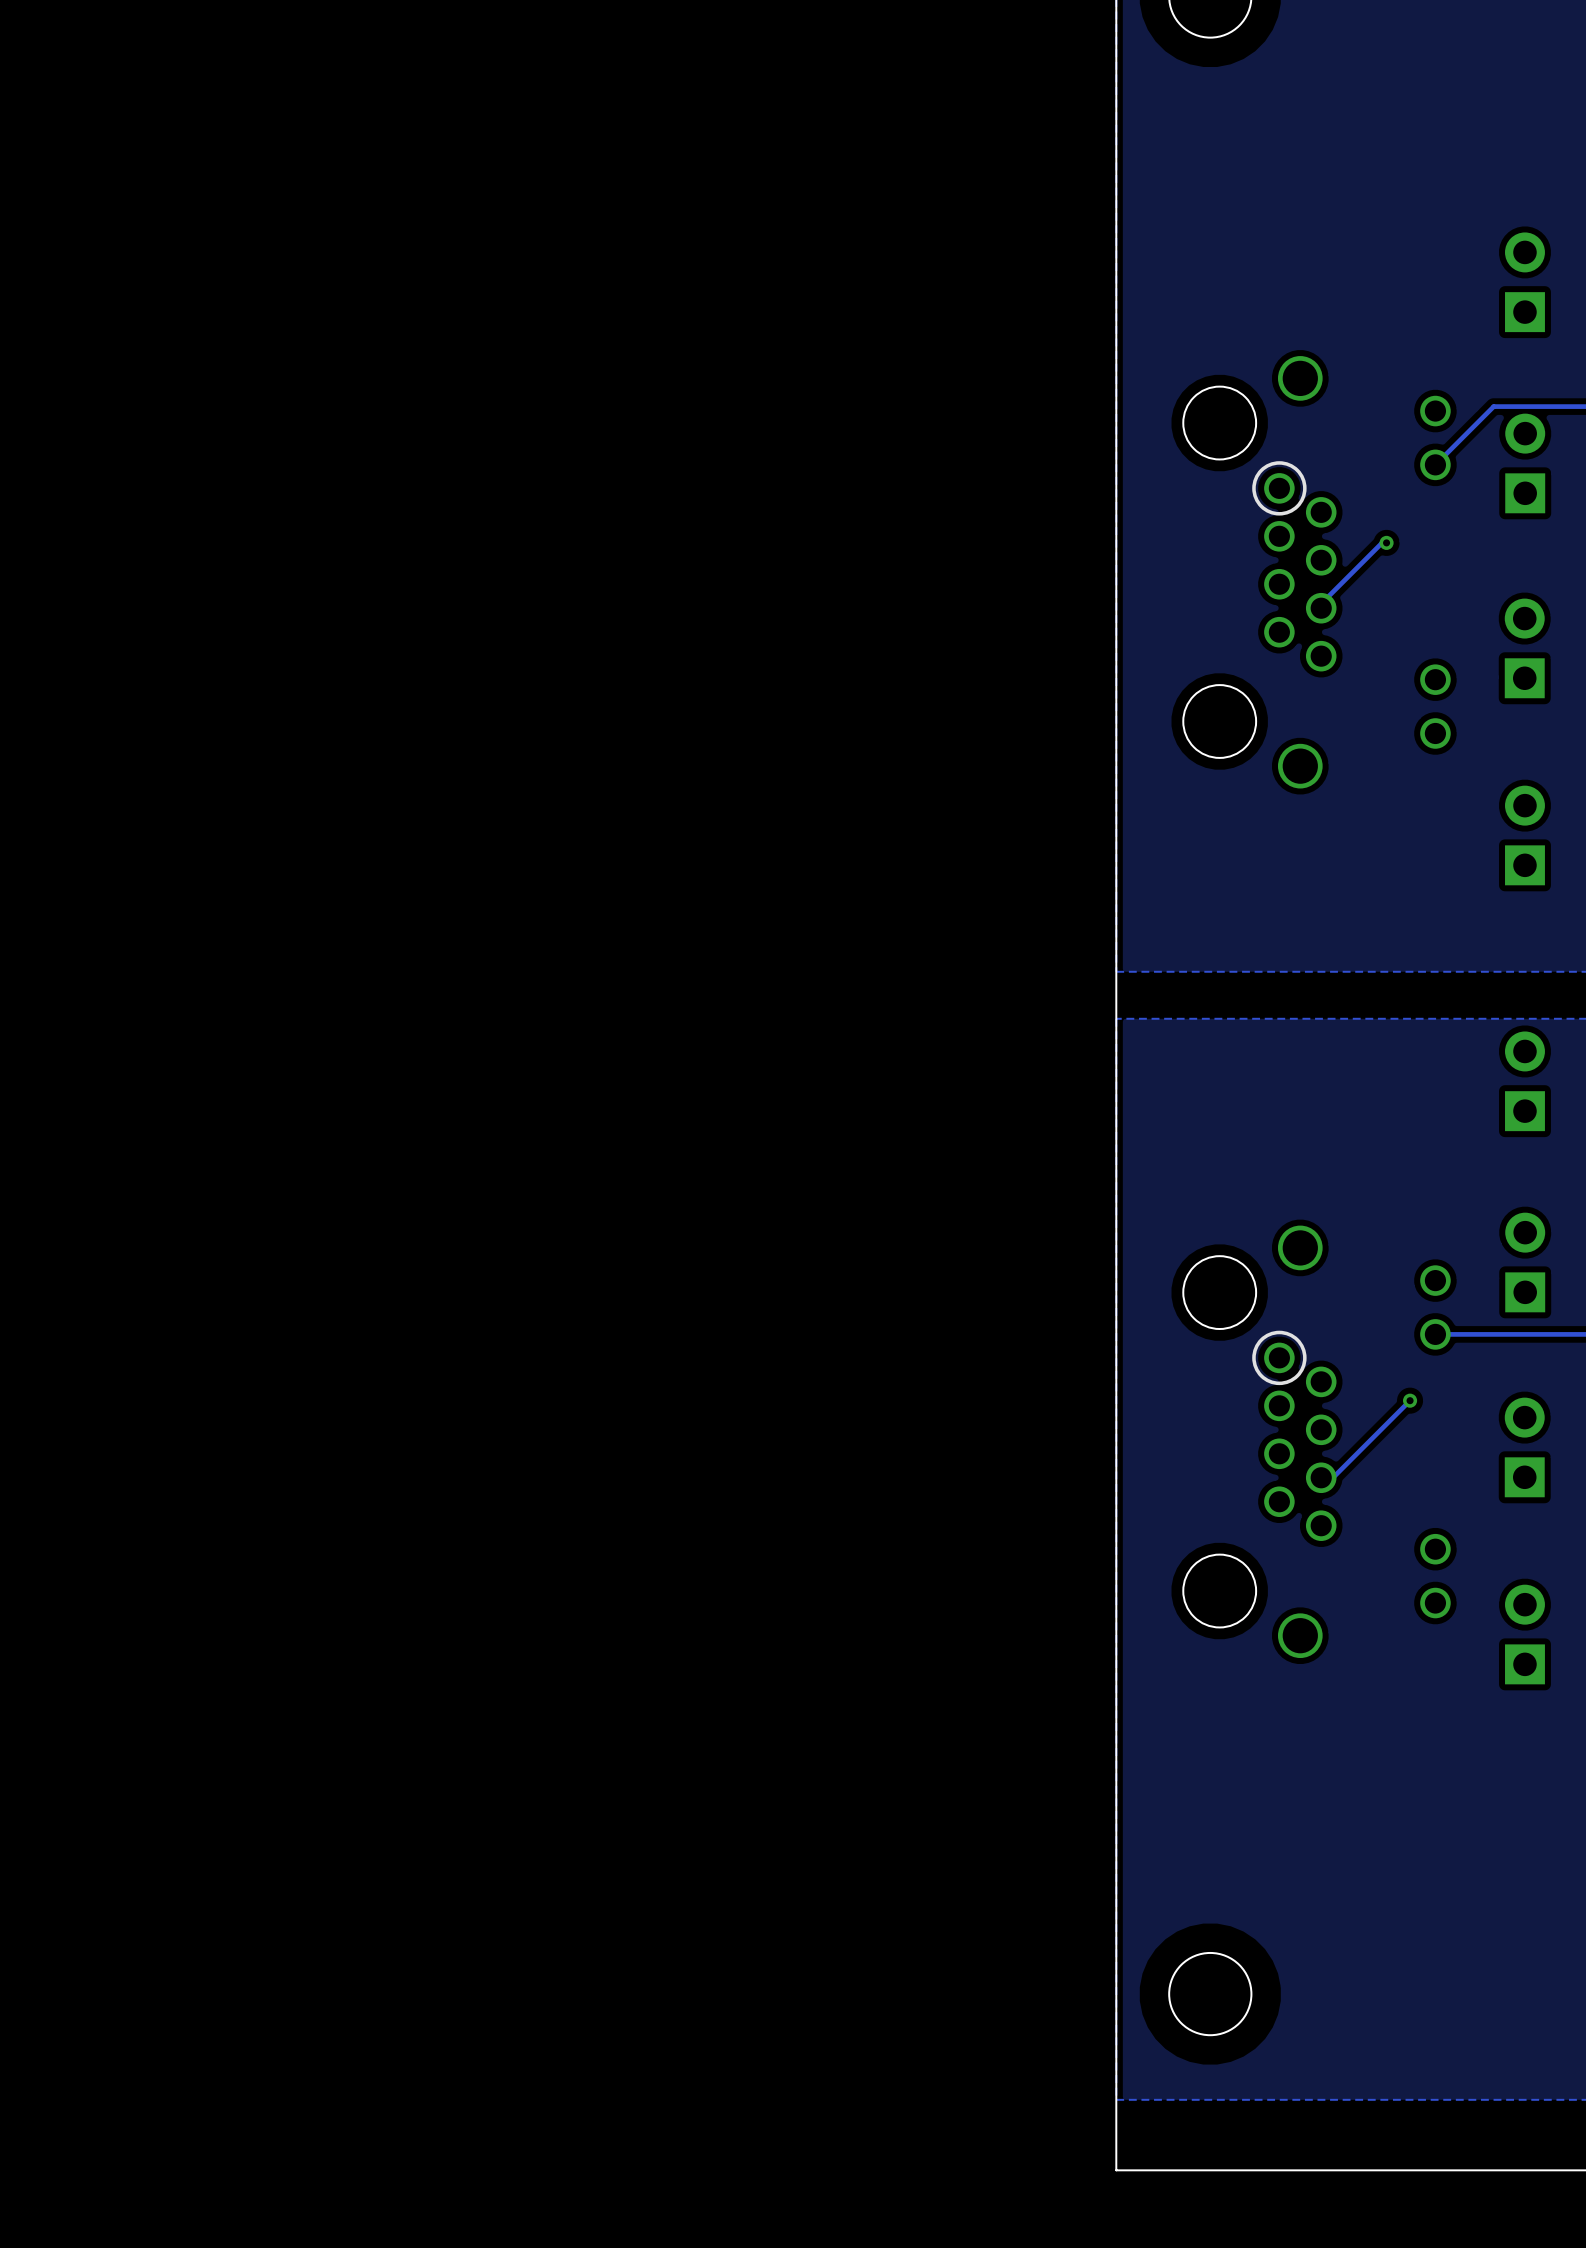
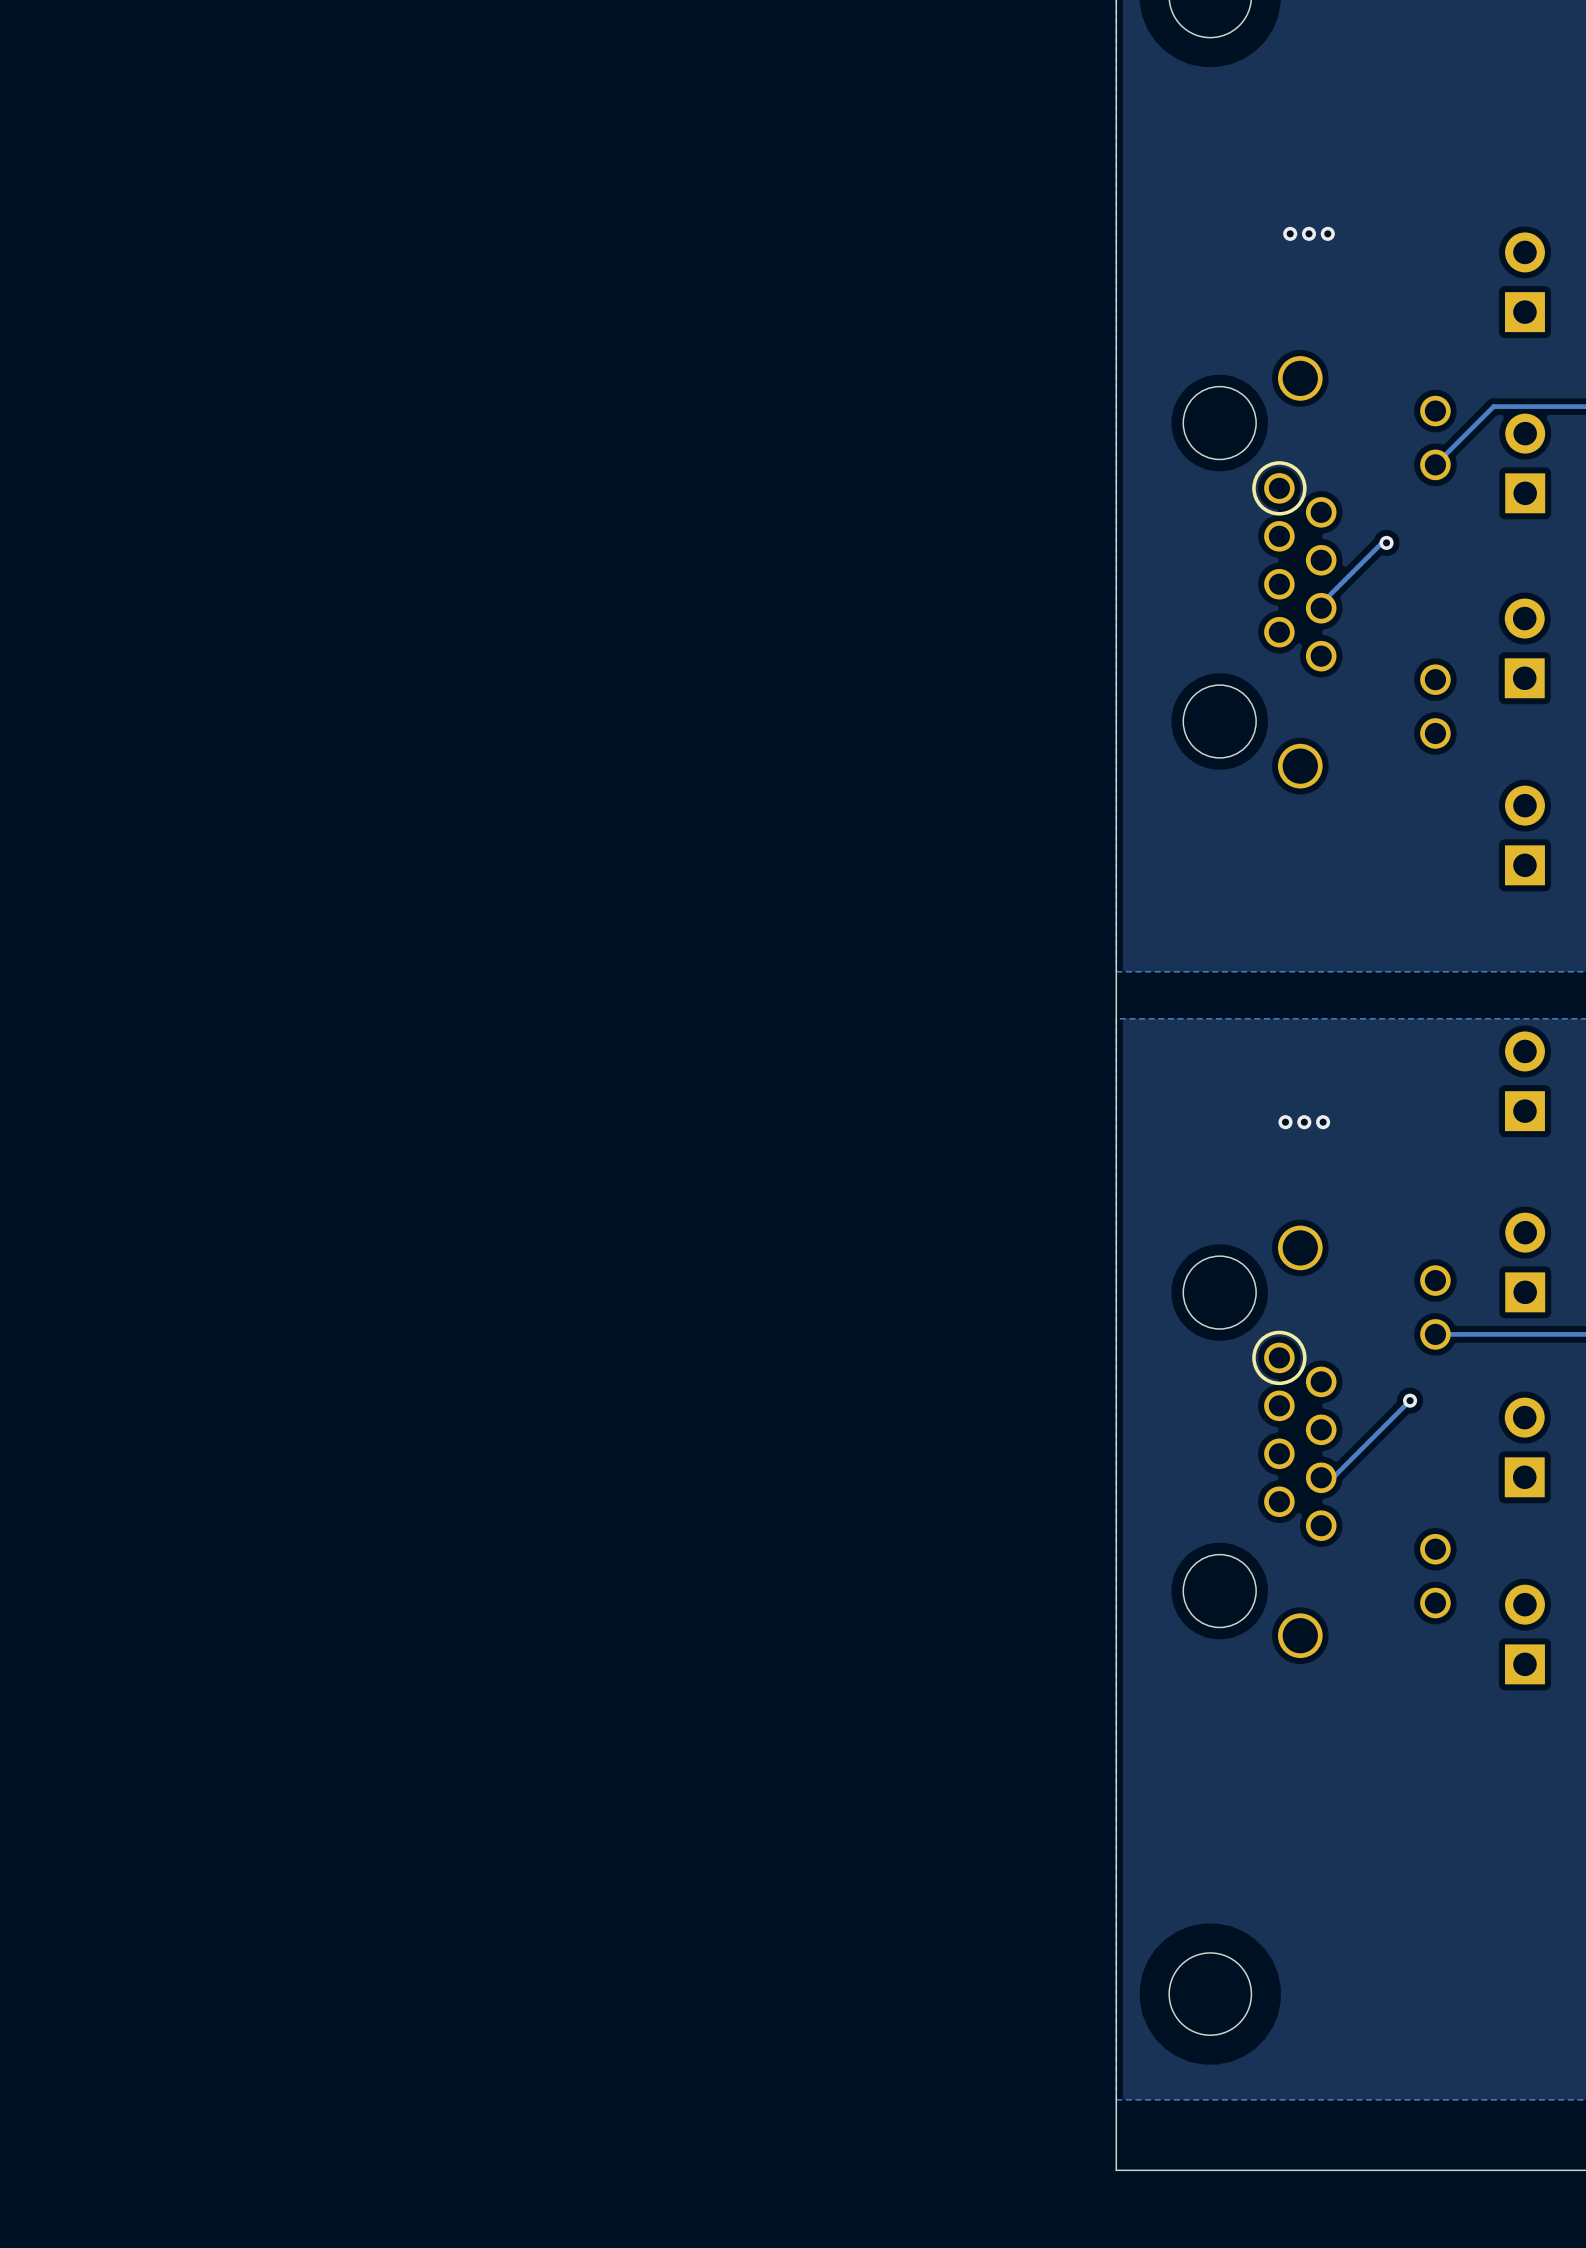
via: none -> (1290, 233)
via: none -> (1309, 233)
via: none -> (1327, 233)
via: none -> (1285, 1122)
via: none -> (1304, 1122)
via: none -> (1323, 1122)

